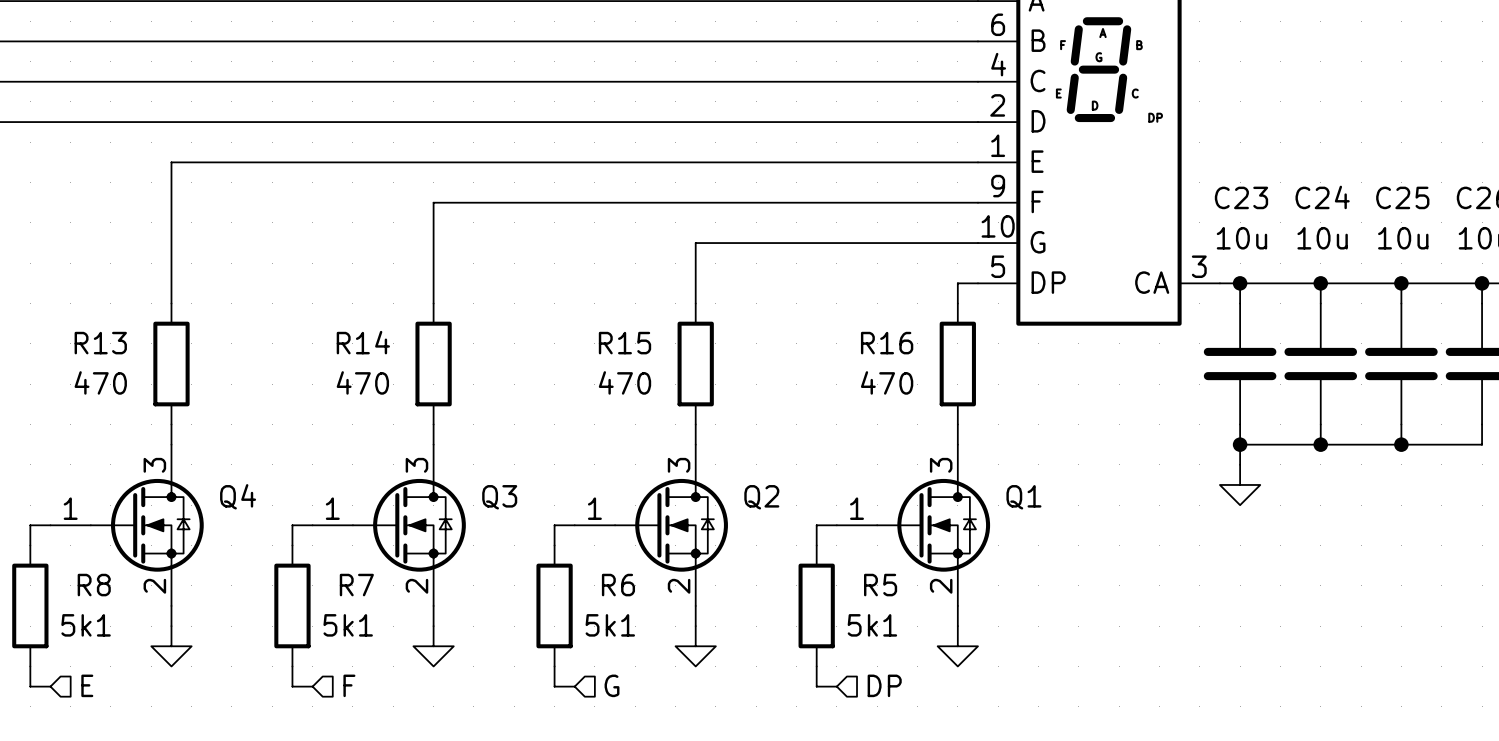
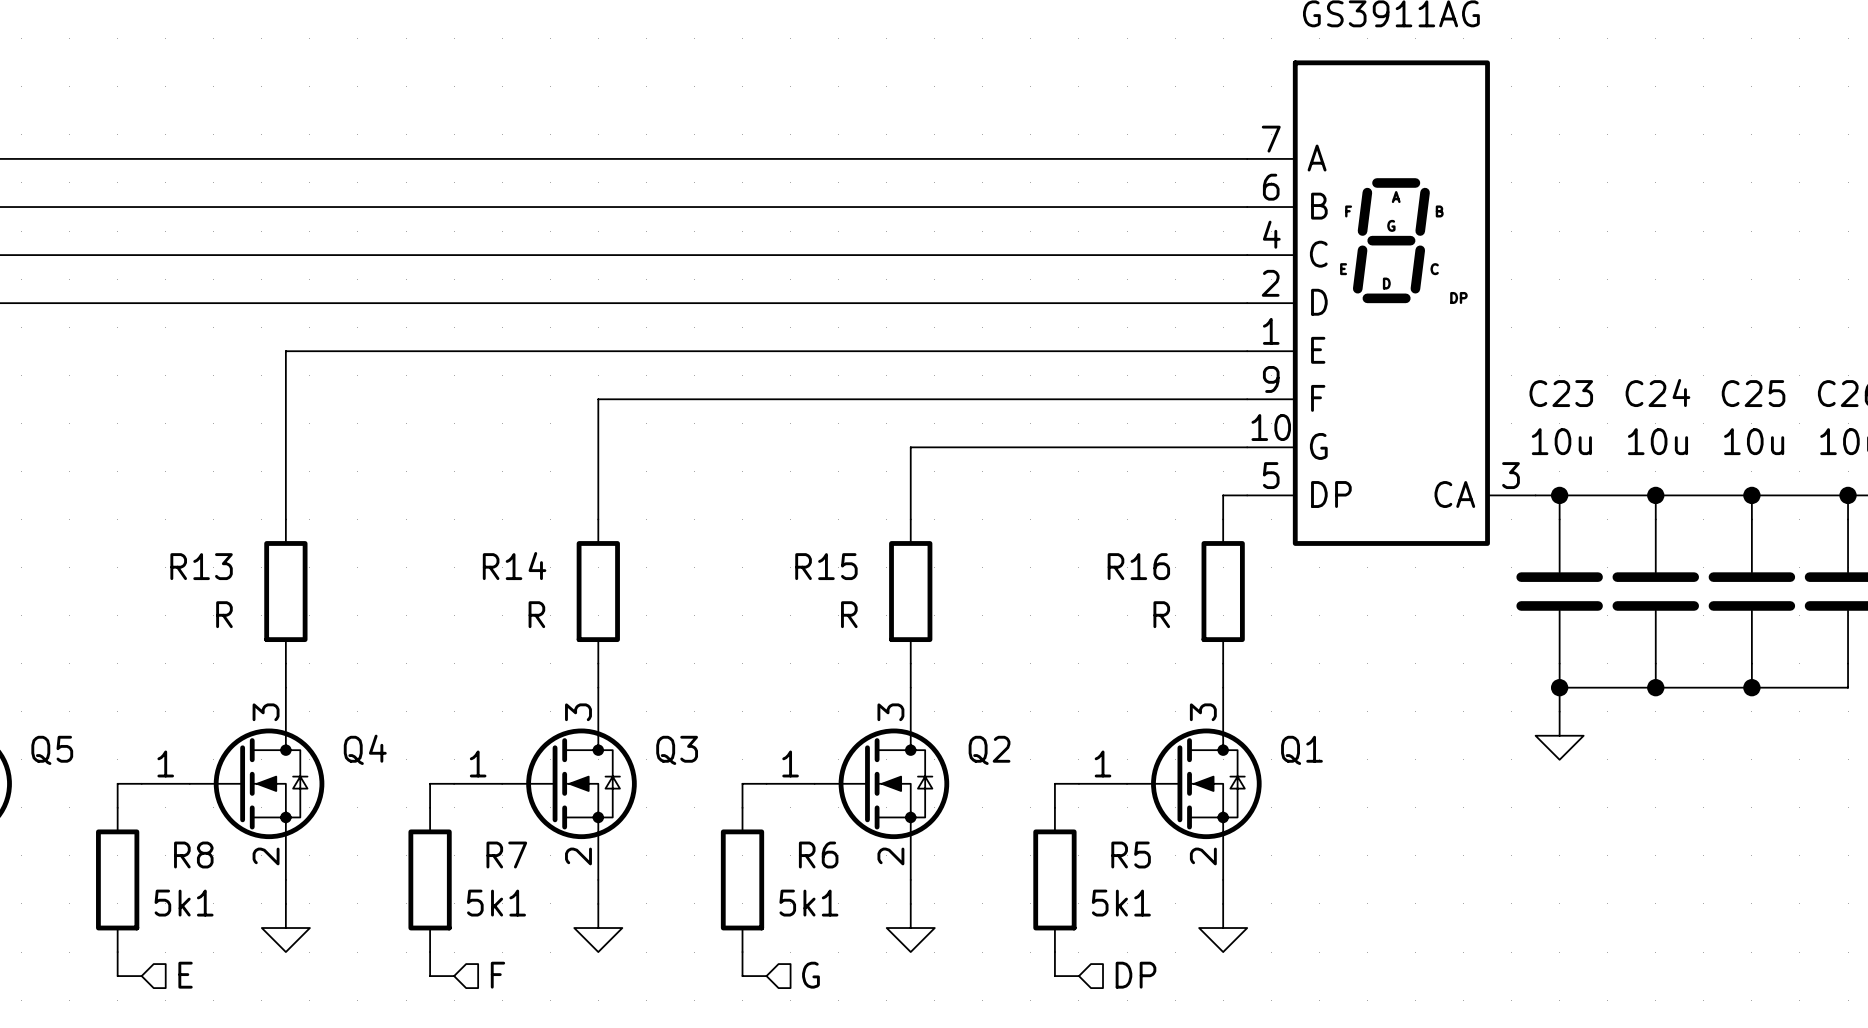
R13 value: 470 (100, 382) -> R (224, 614)
R14 value: 470 (362, 382) -> R (536, 614)
R15 value: 470 (624, 382) -> R (849, 614)
R16 value: 470 (887, 382) -> R (1161, 614)

